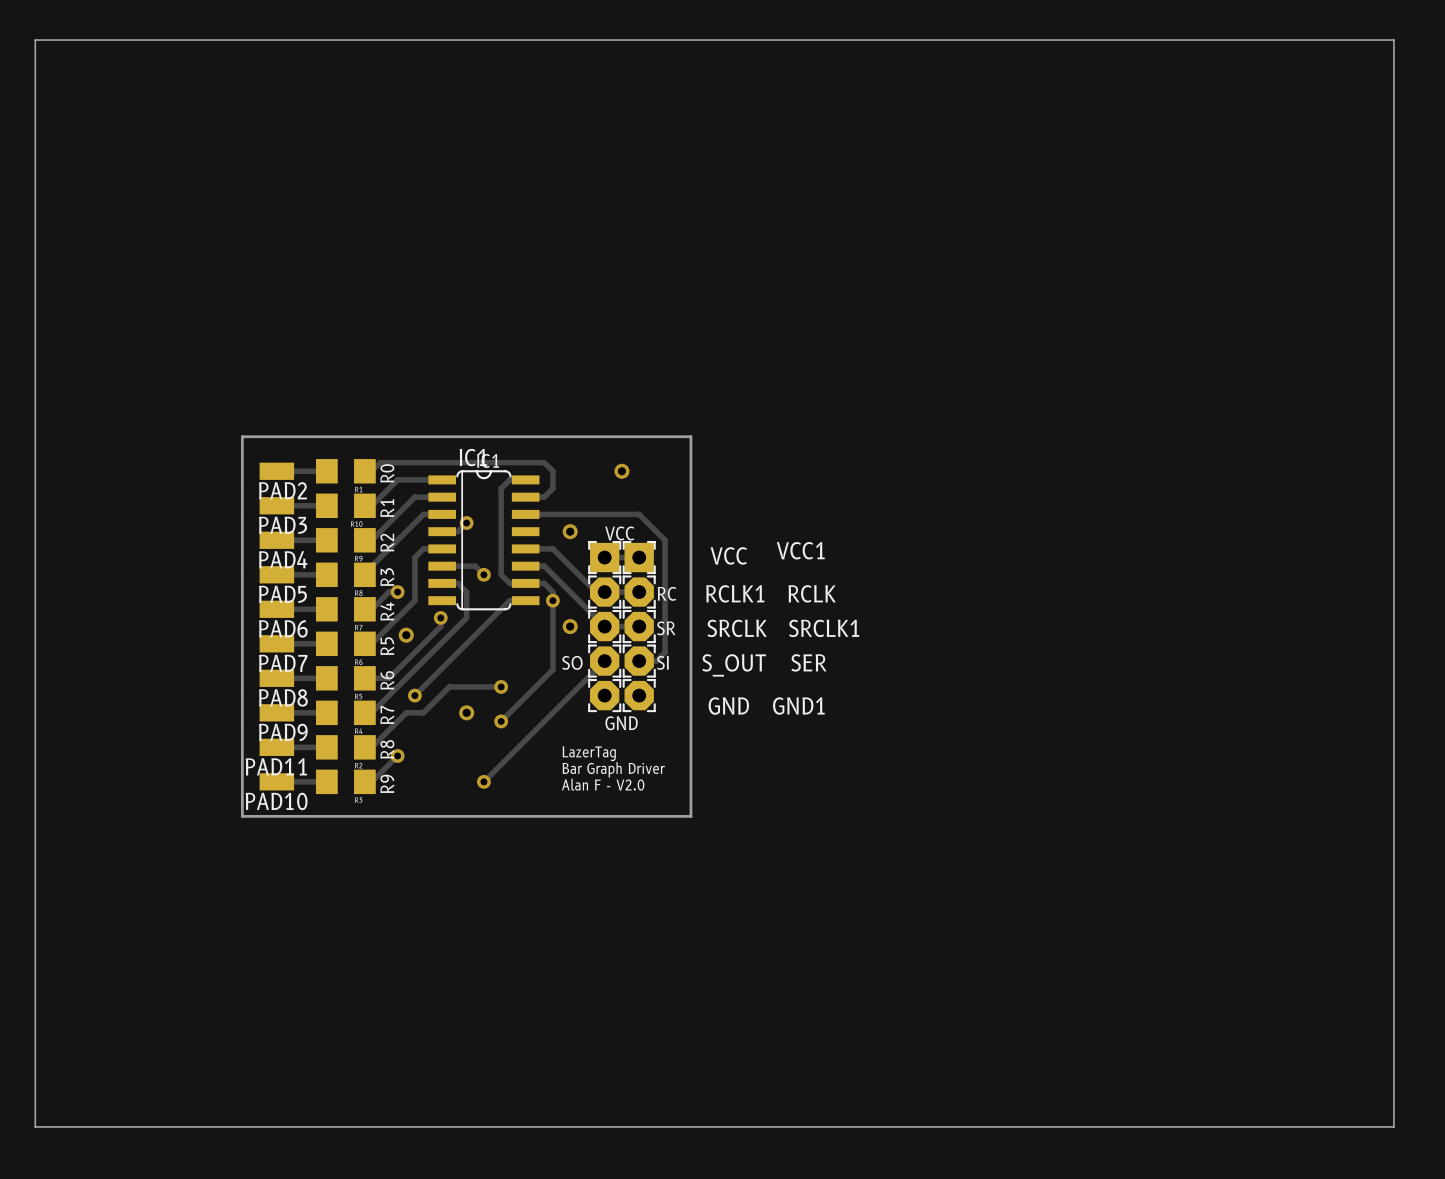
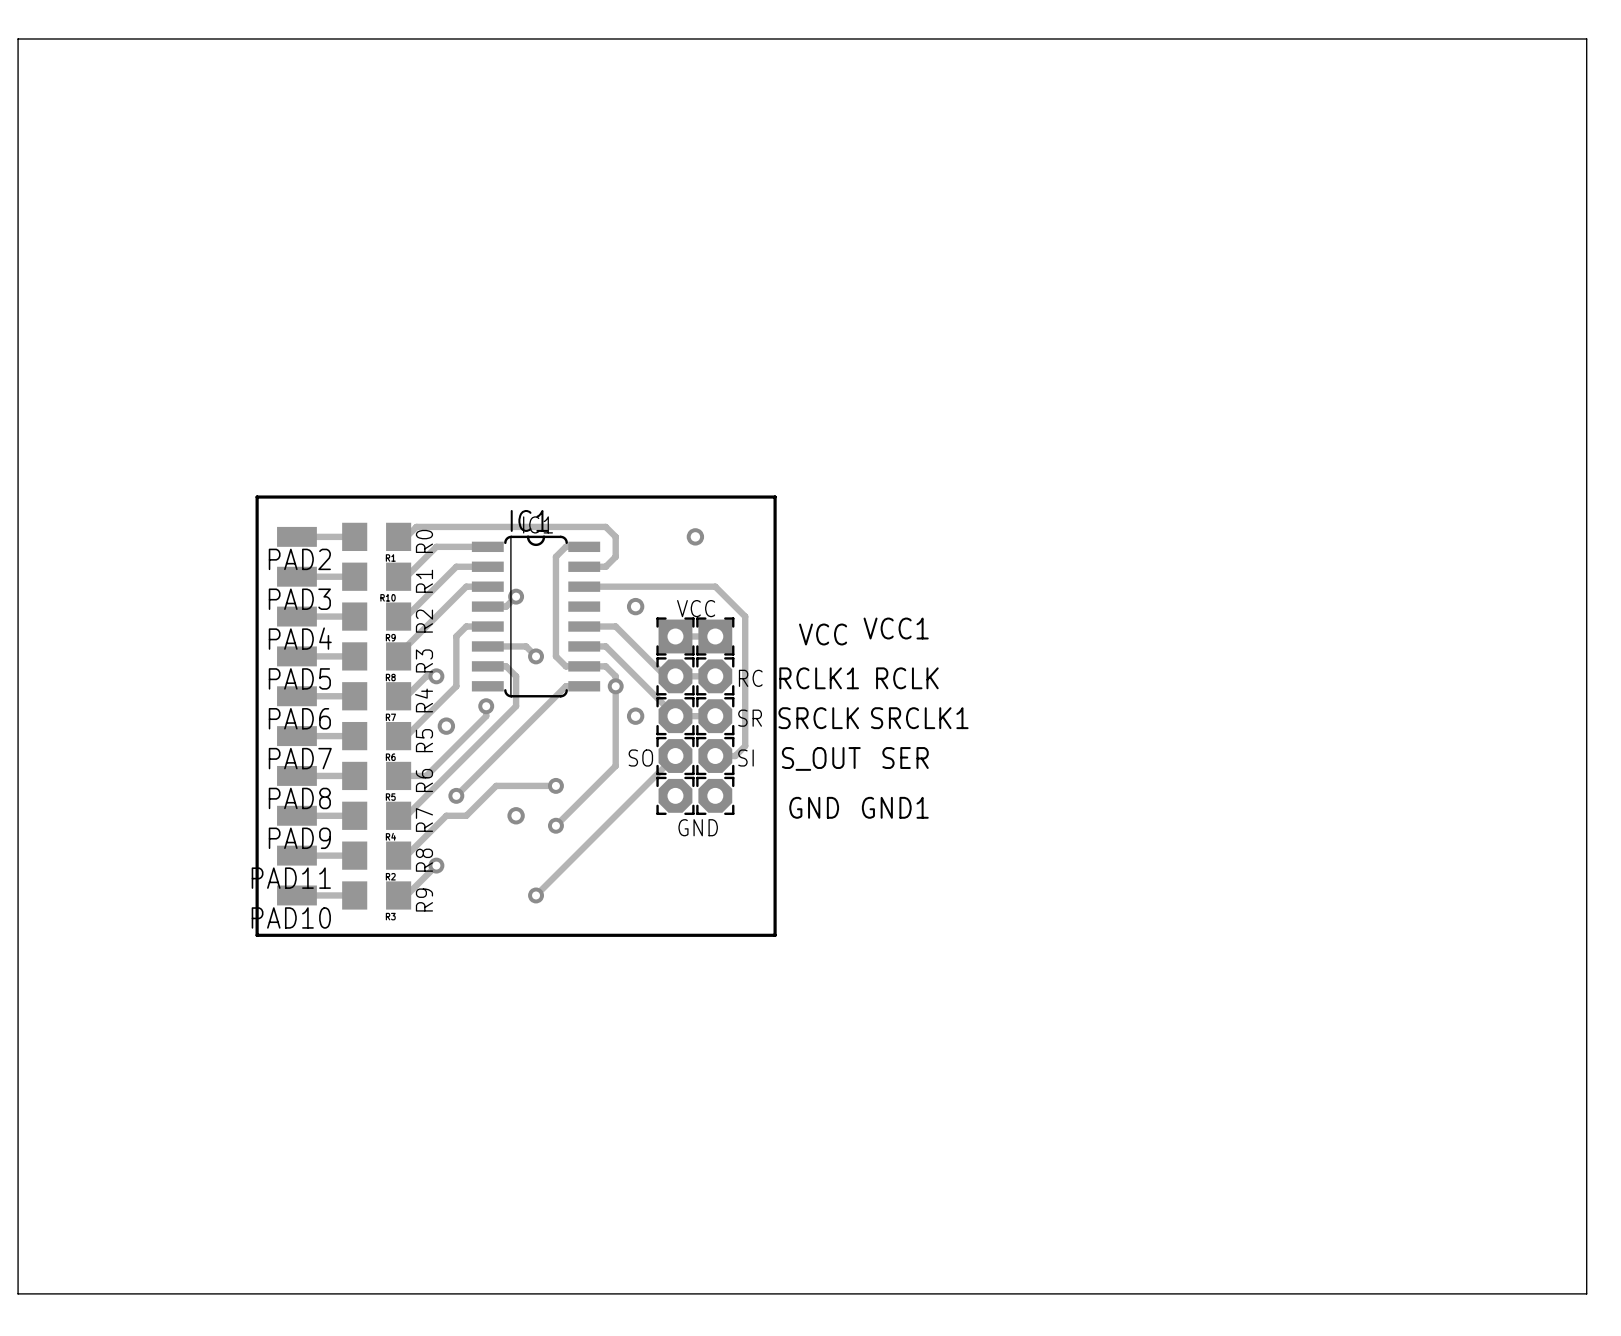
text: LazerTag (589, 753) -> none
text: Bar Graph Driver (613, 769) -> none
text: Alan F - V2.0 (603, 784) -> none

